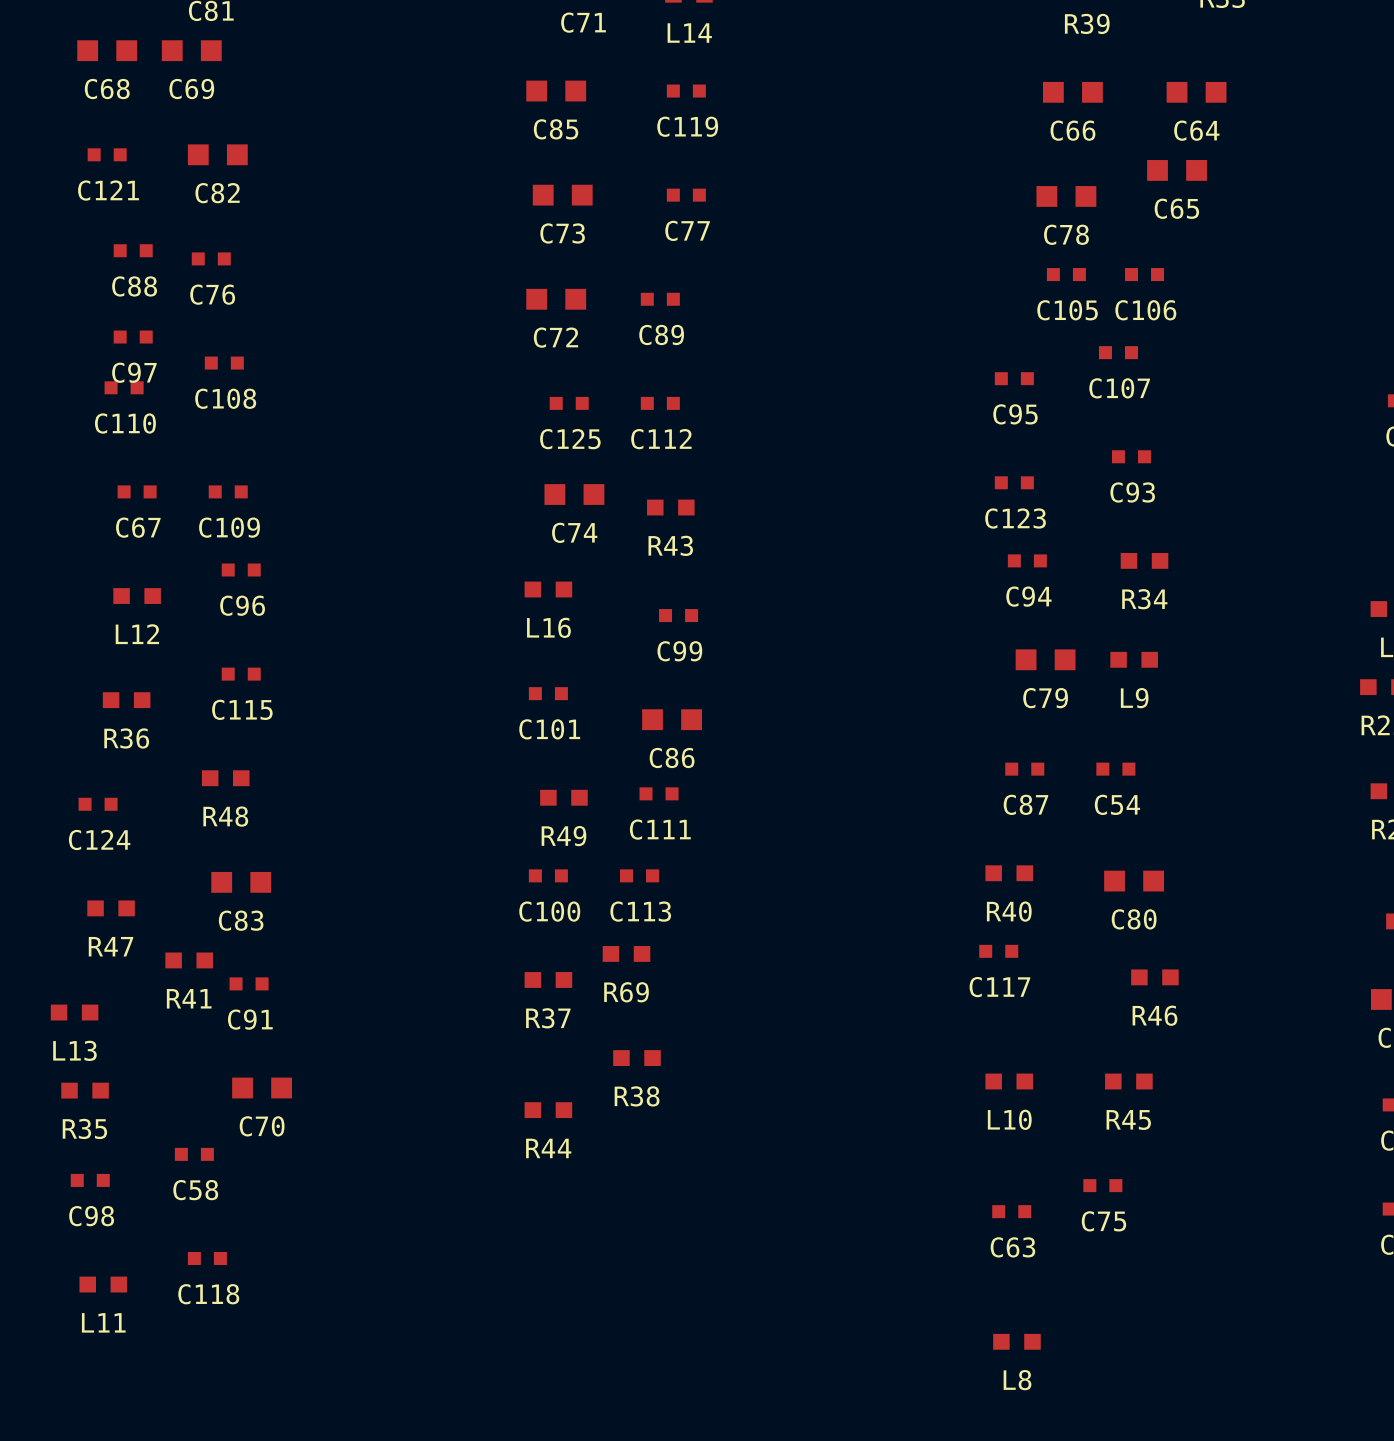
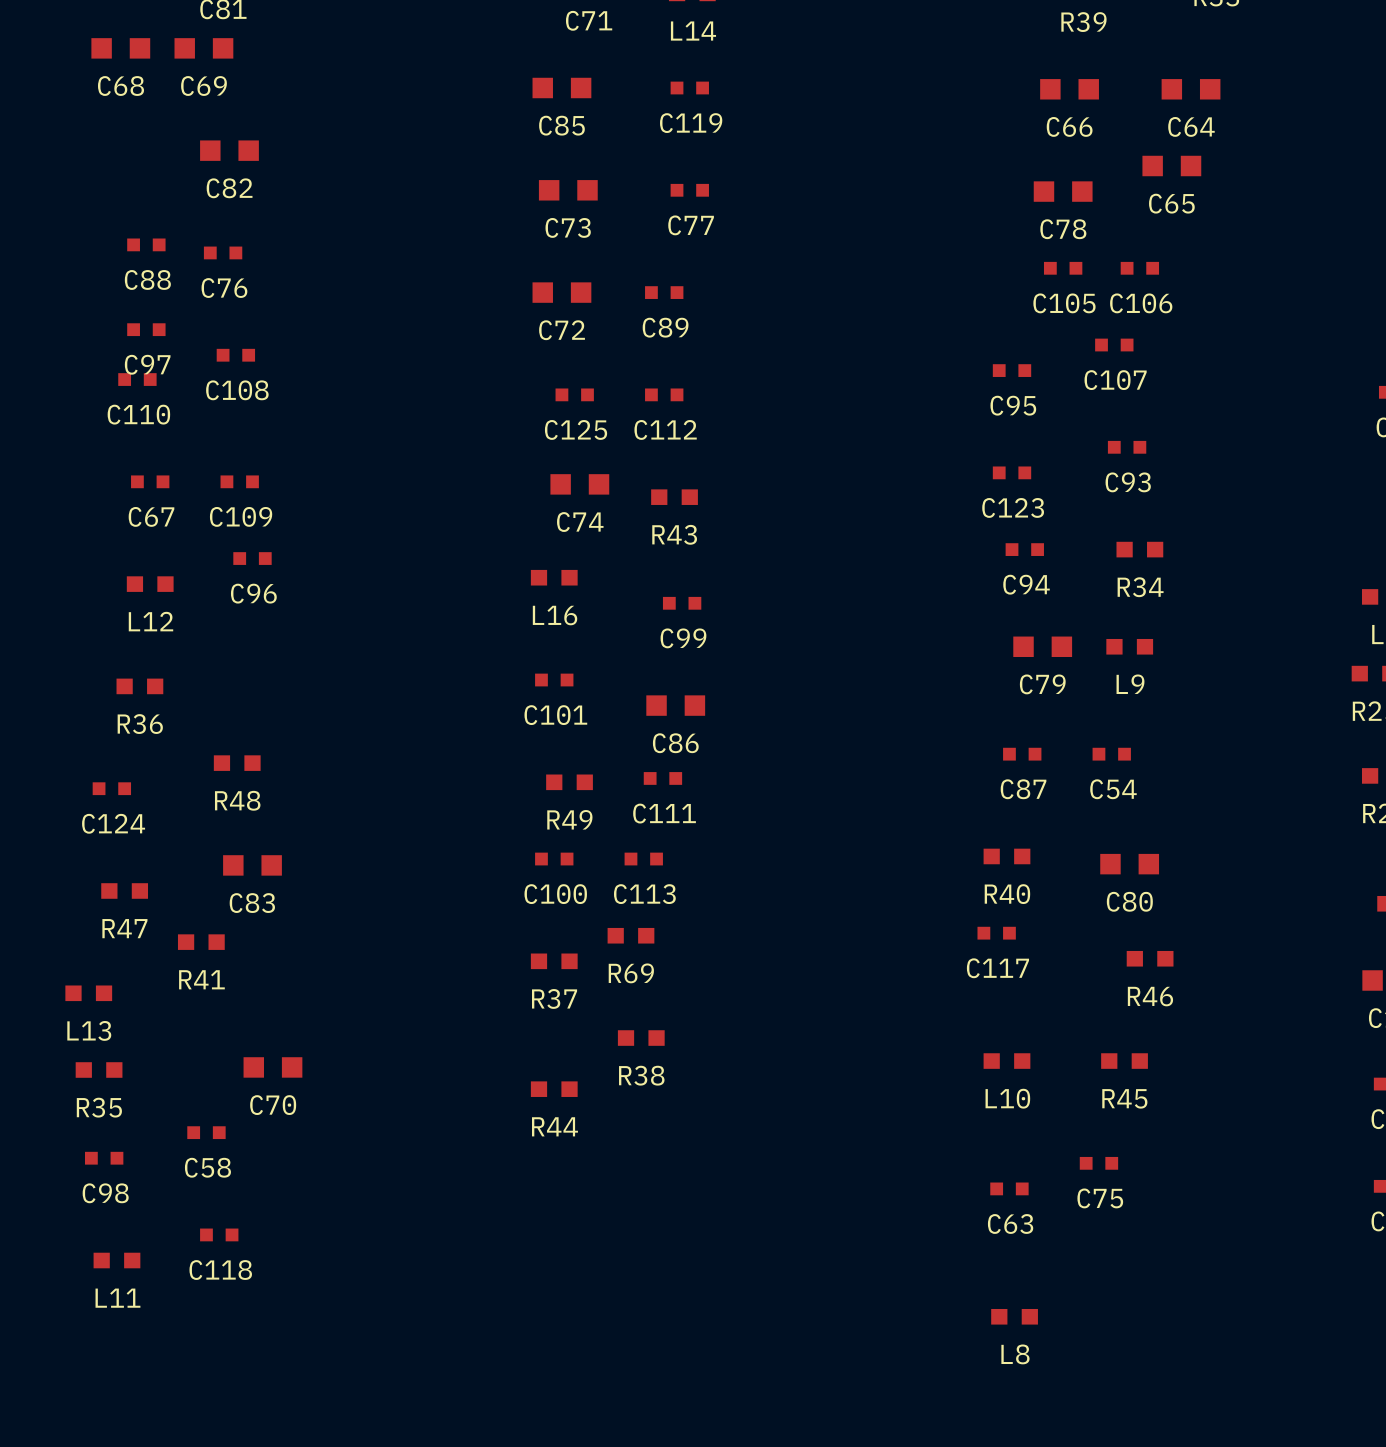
C121: (107, 154) -> none
C115: (241, 674) -> none
C91: (249, 983) -> none

